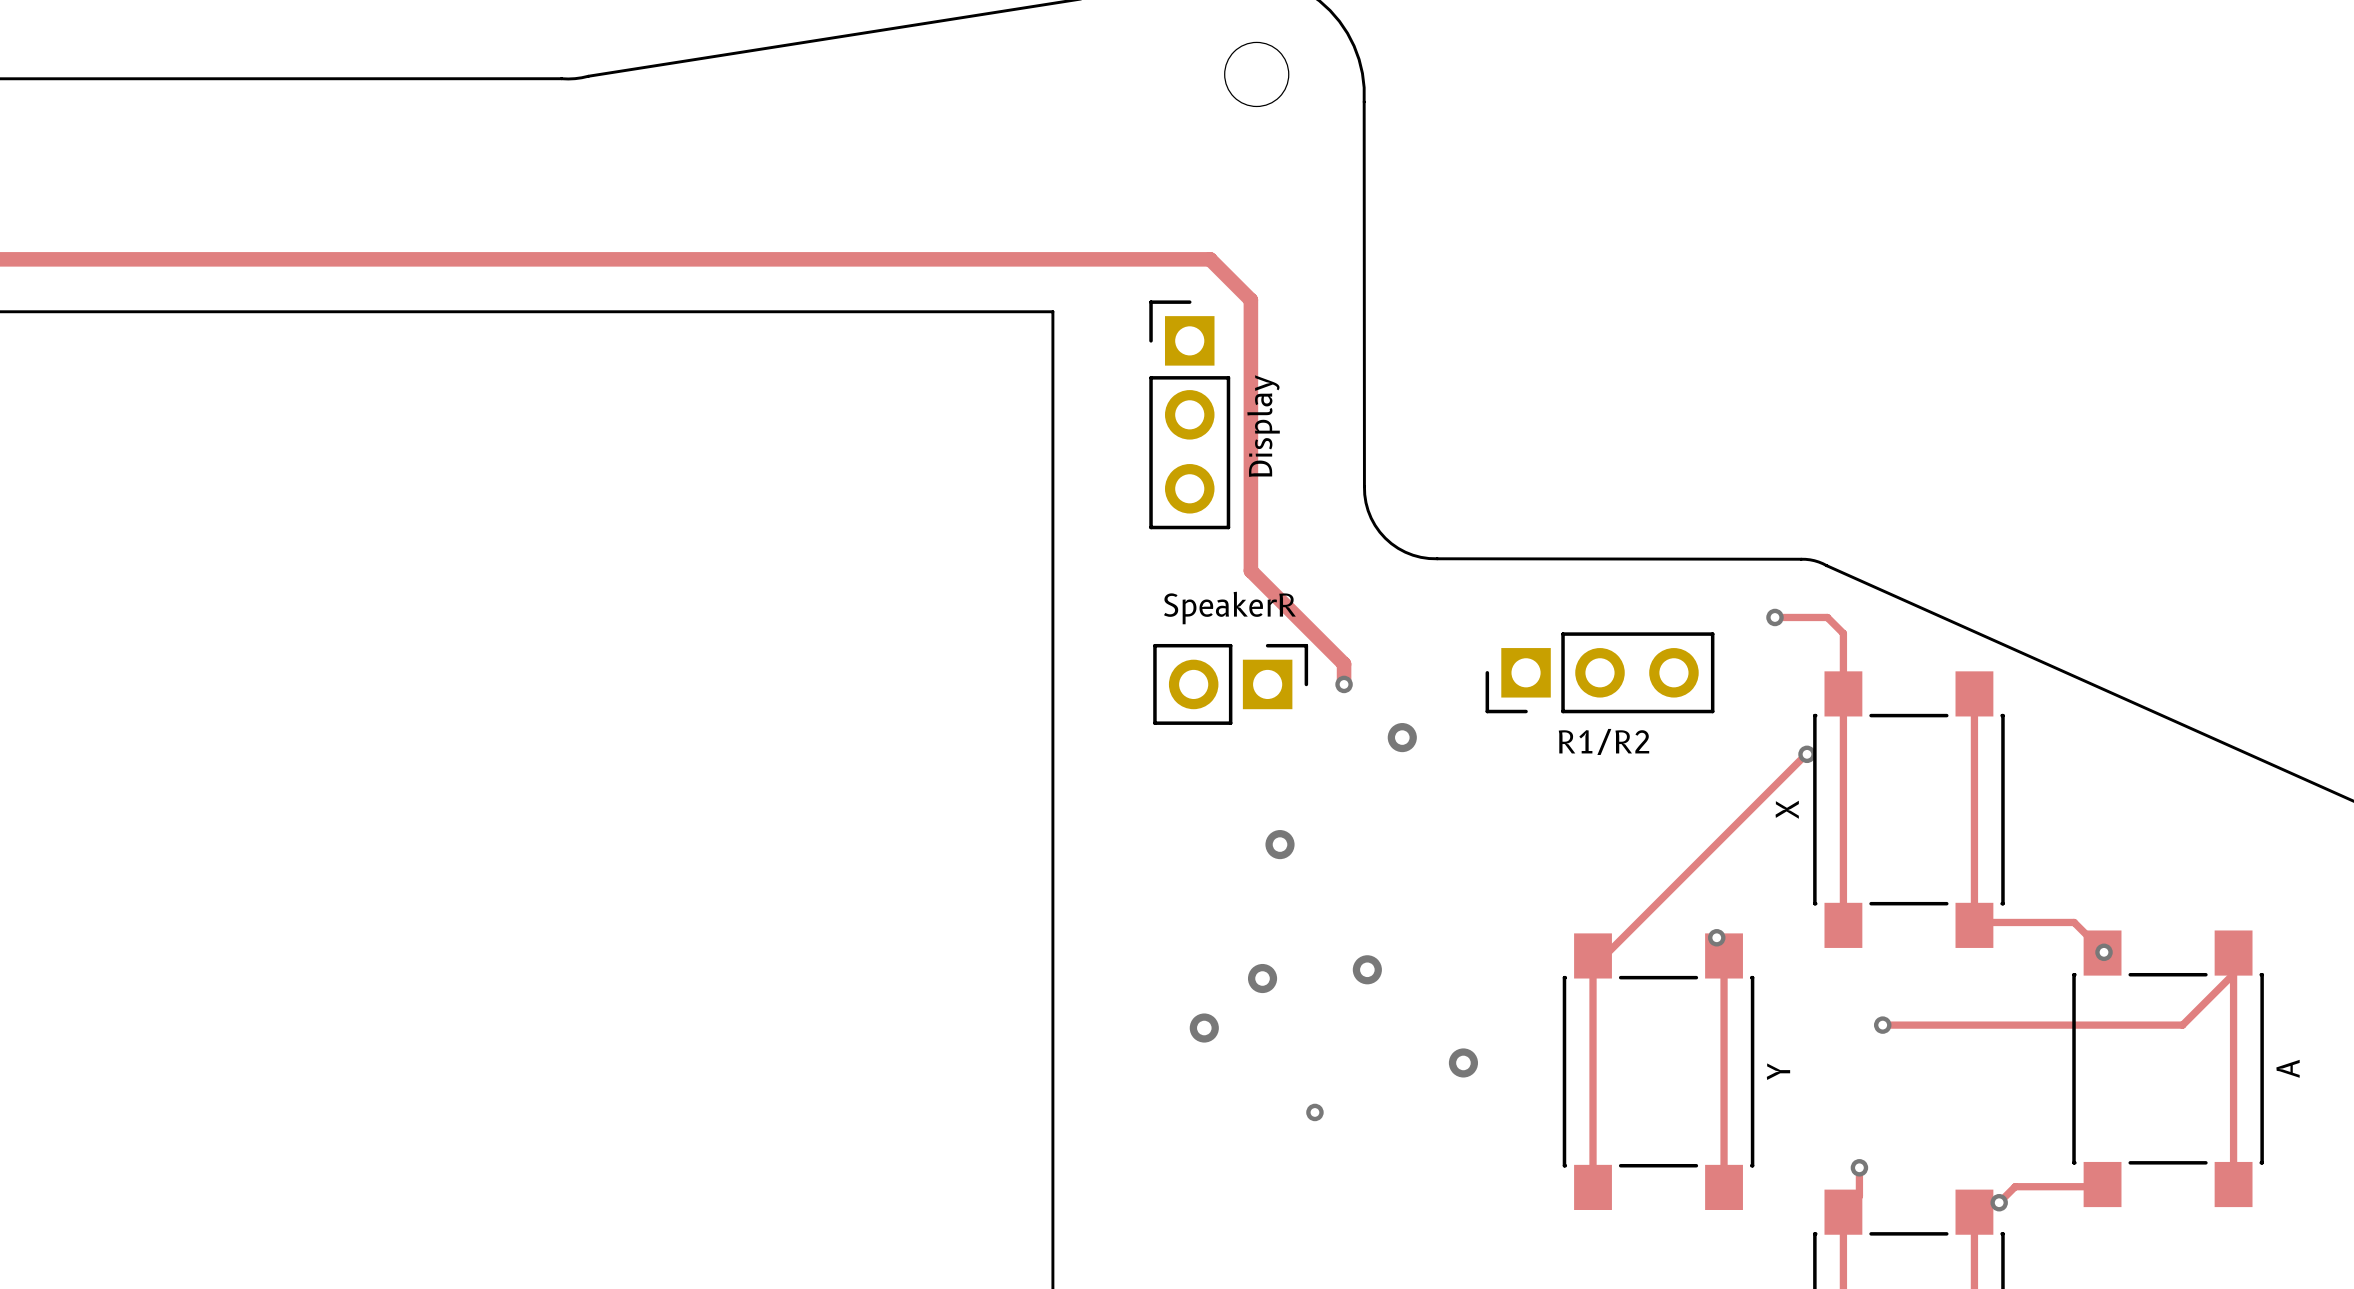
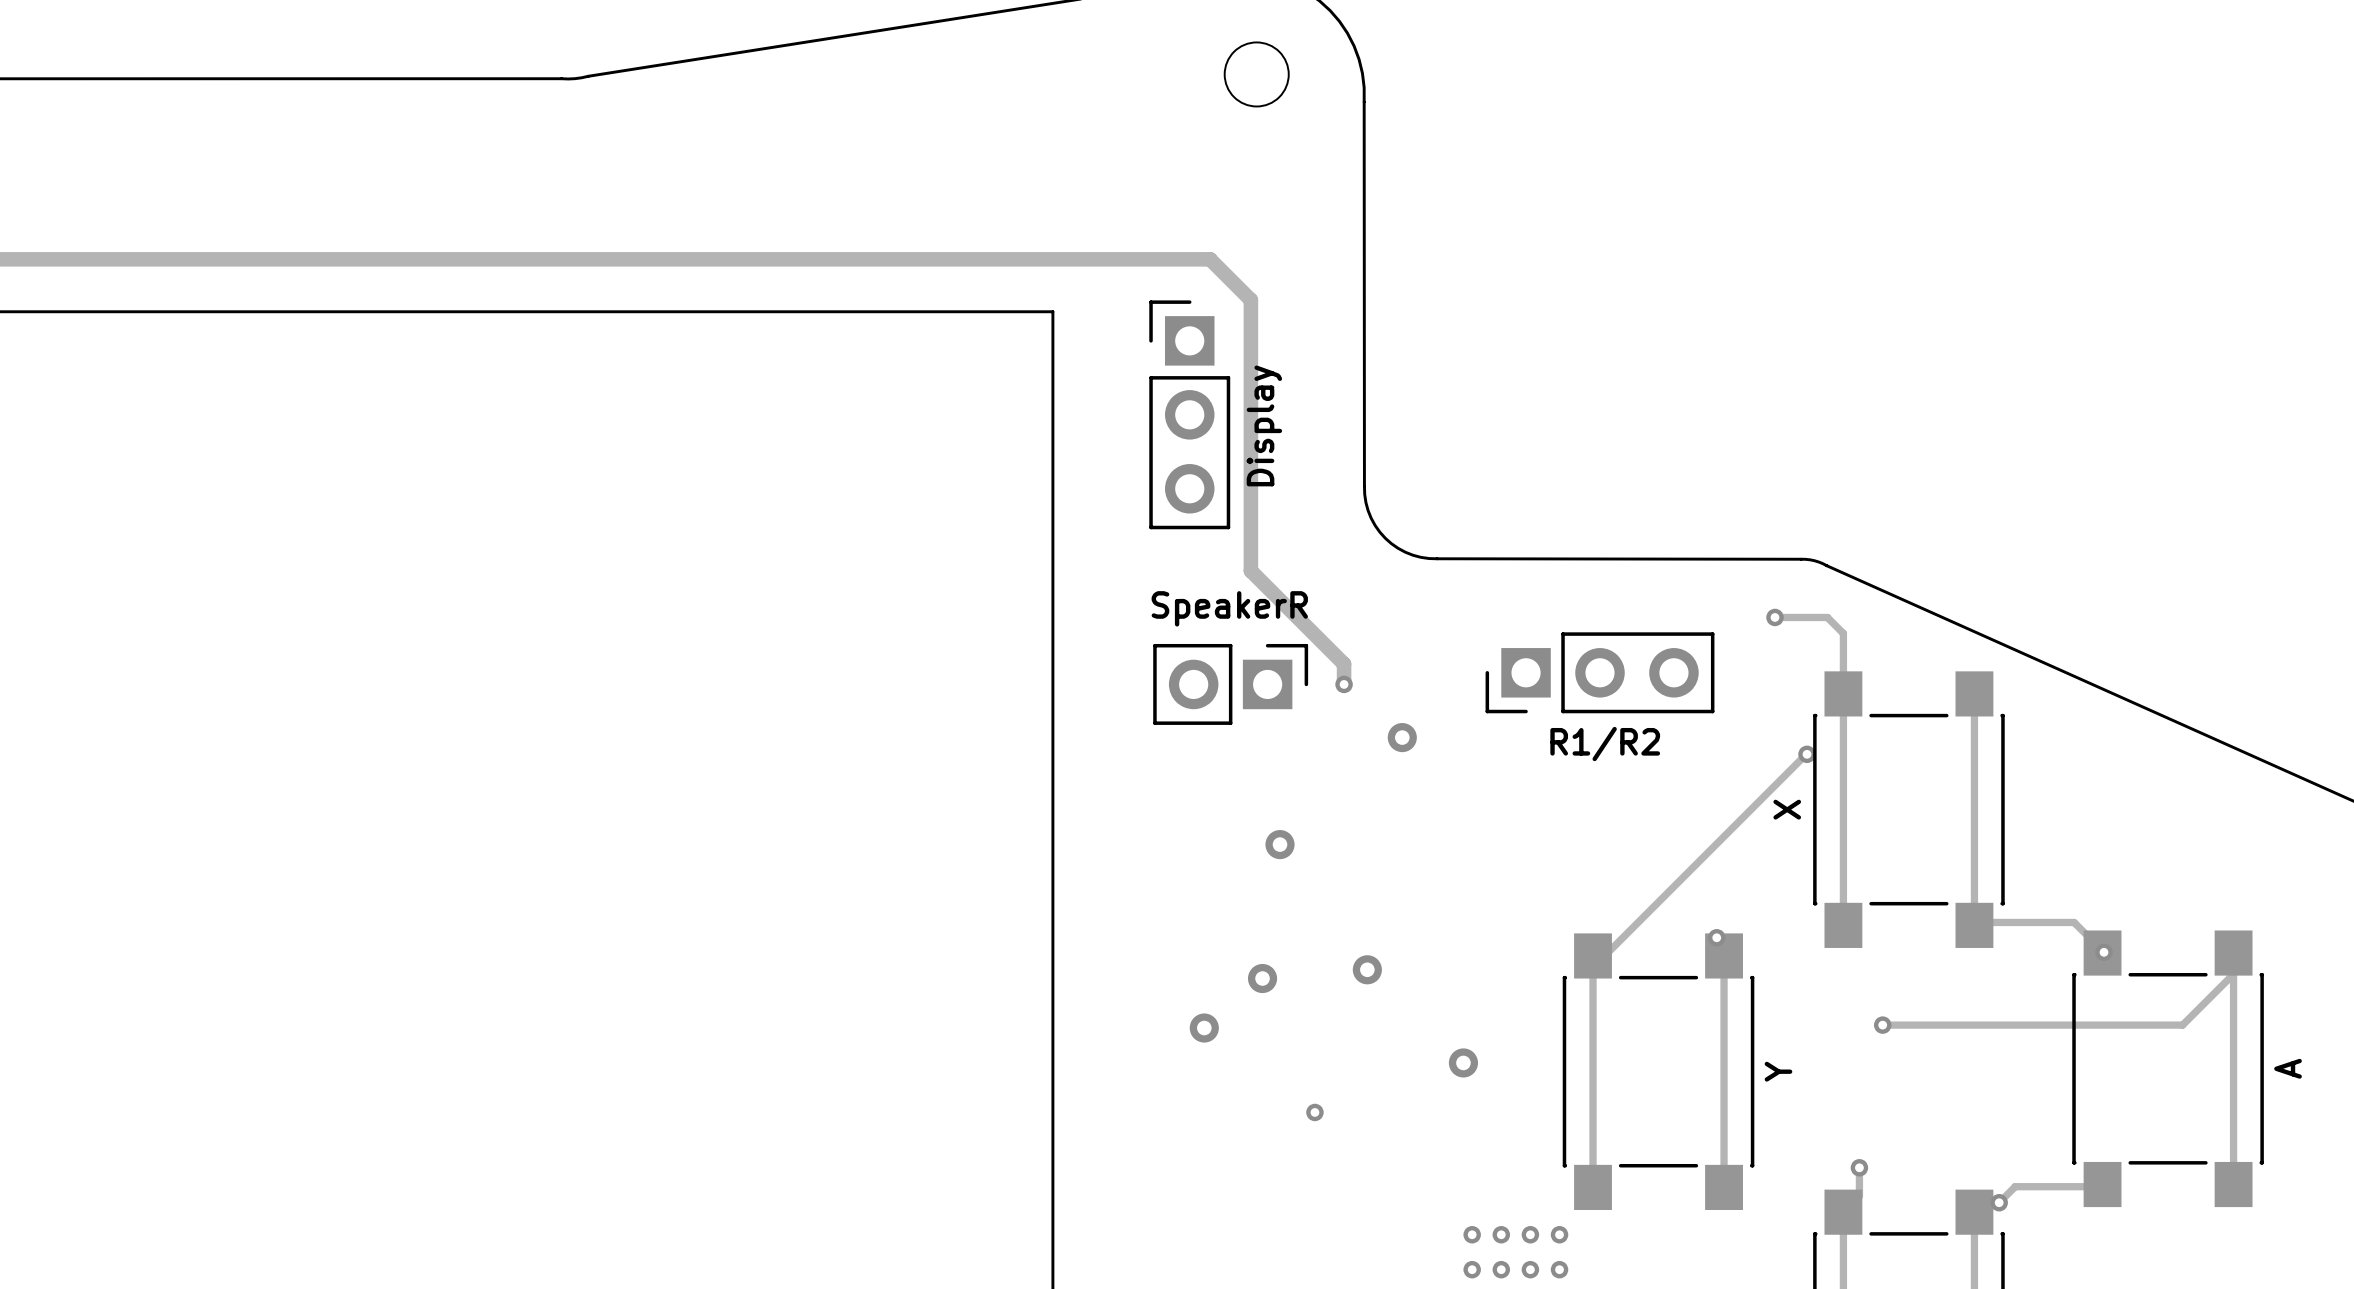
via: none -> (1472, 1234)
via: none -> (1501, 1234)
via: none -> (1530, 1234)
via: none -> (1559, 1234)
via: none -> (1472, 1269)
via: none -> (1501, 1269)
via: none -> (1530, 1269)
via: none -> (1559, 1269)

